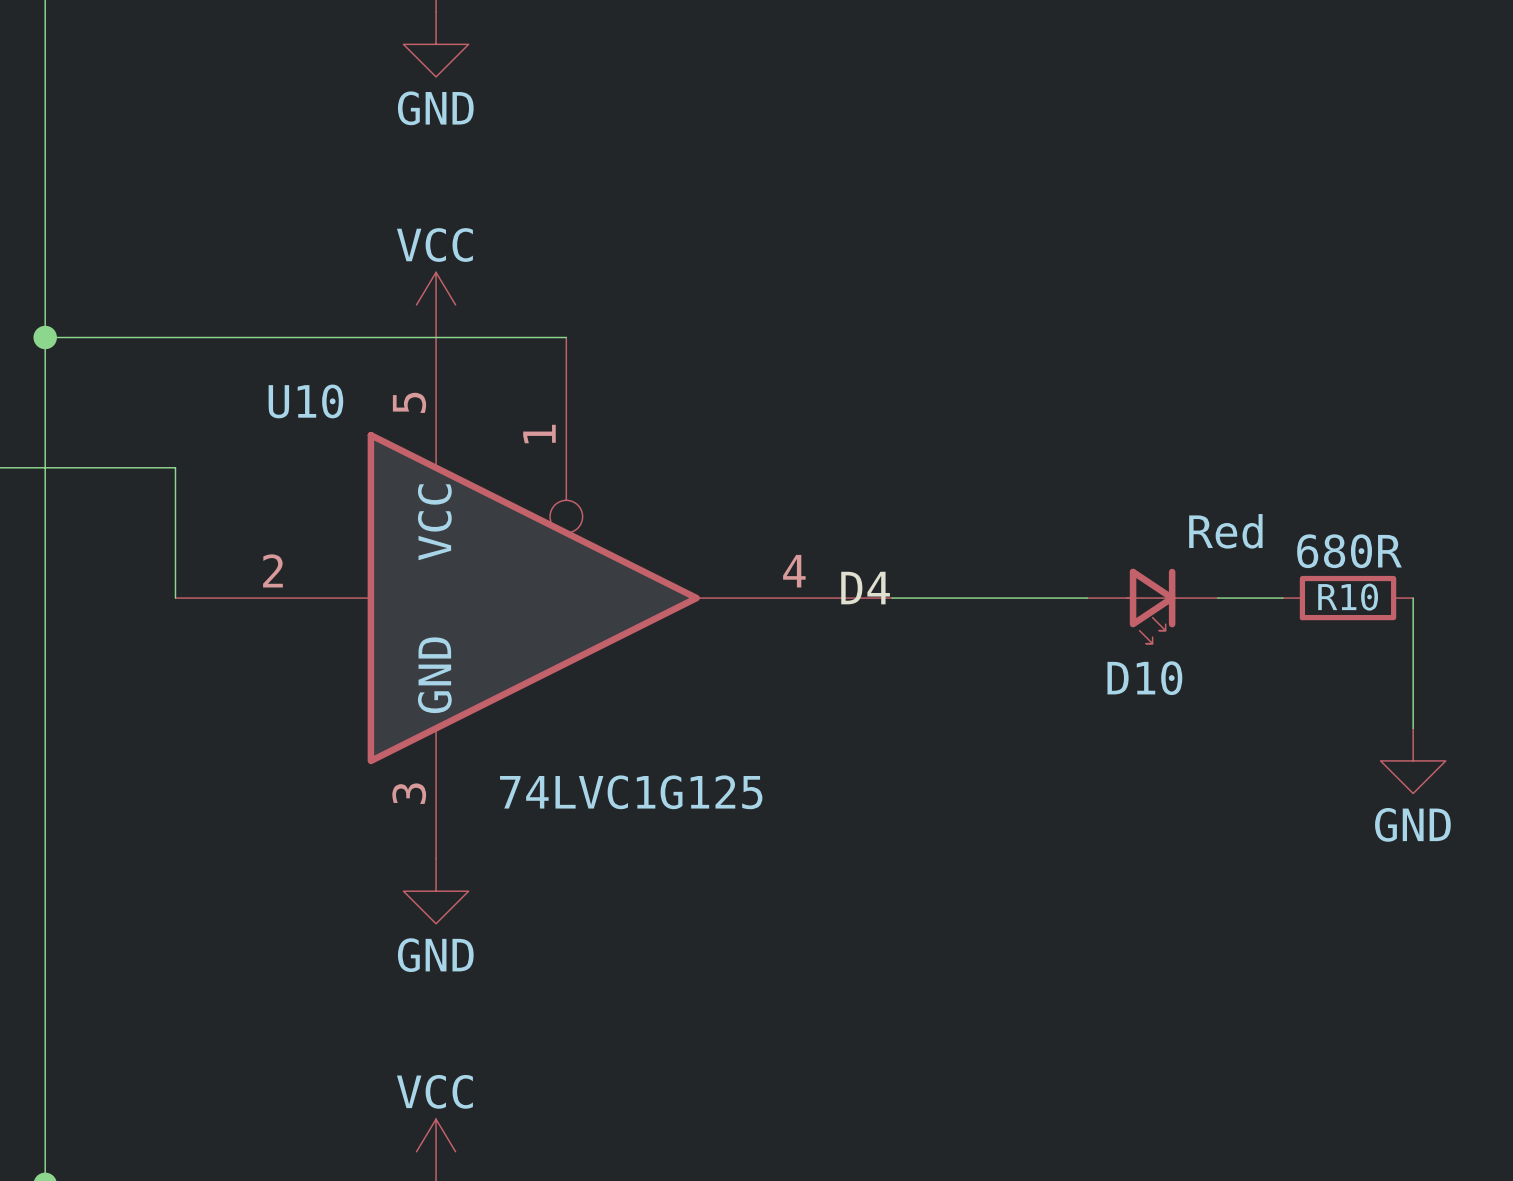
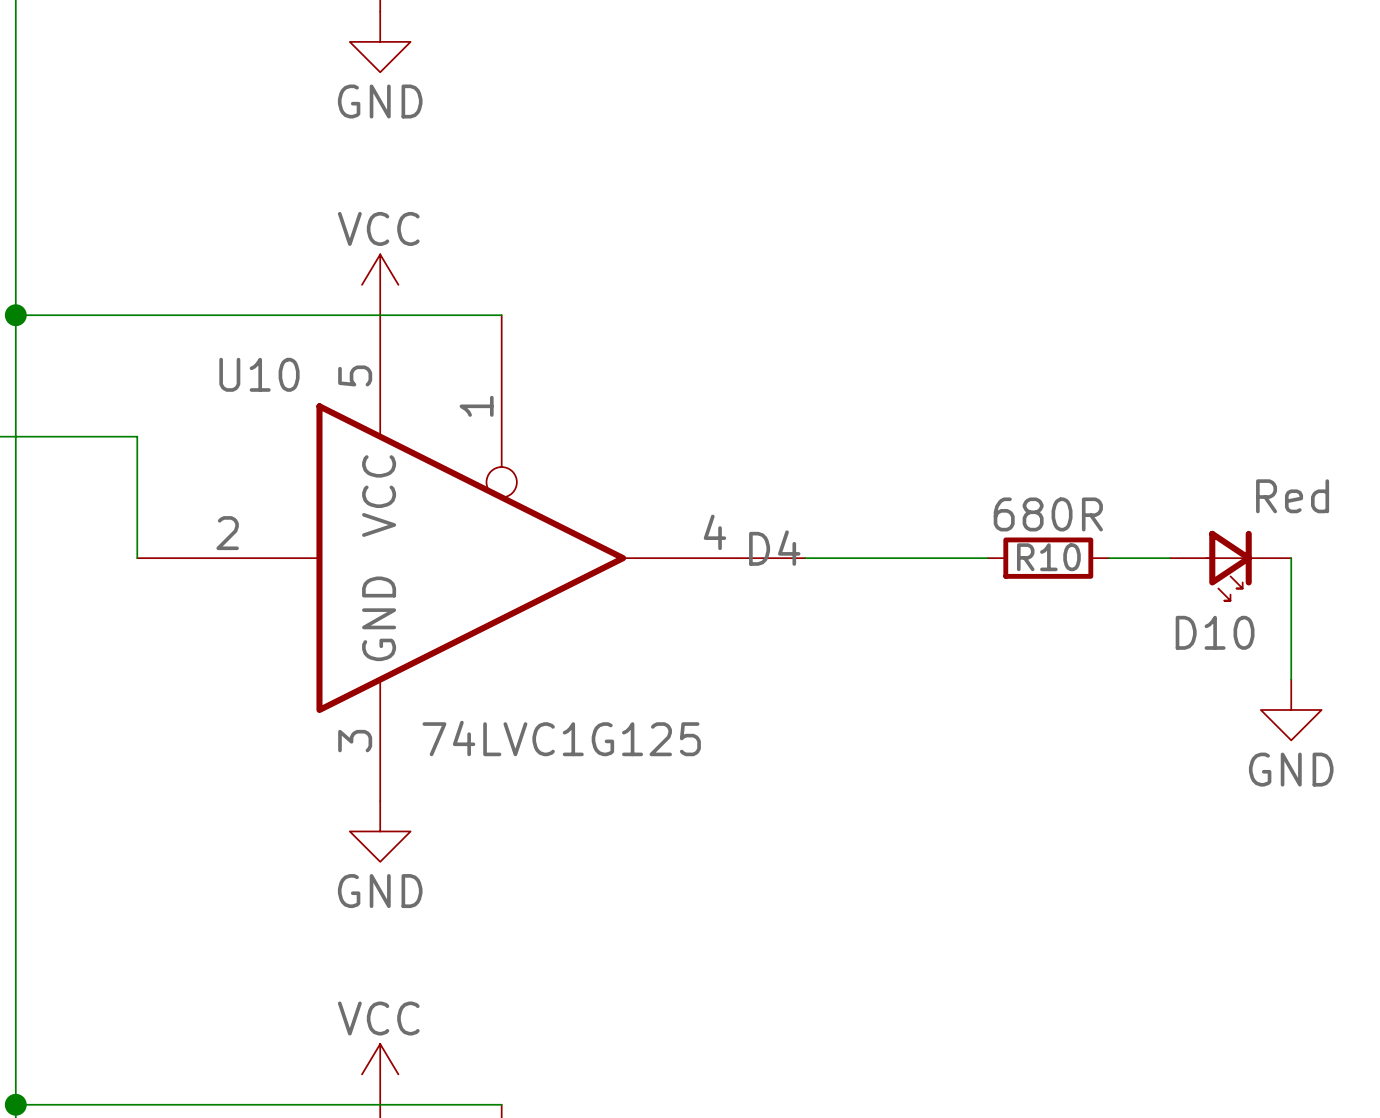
R10 position: (1348, 598) -> (1048, 558)
D10 position: (1152, 606) -> (1230, 565)

